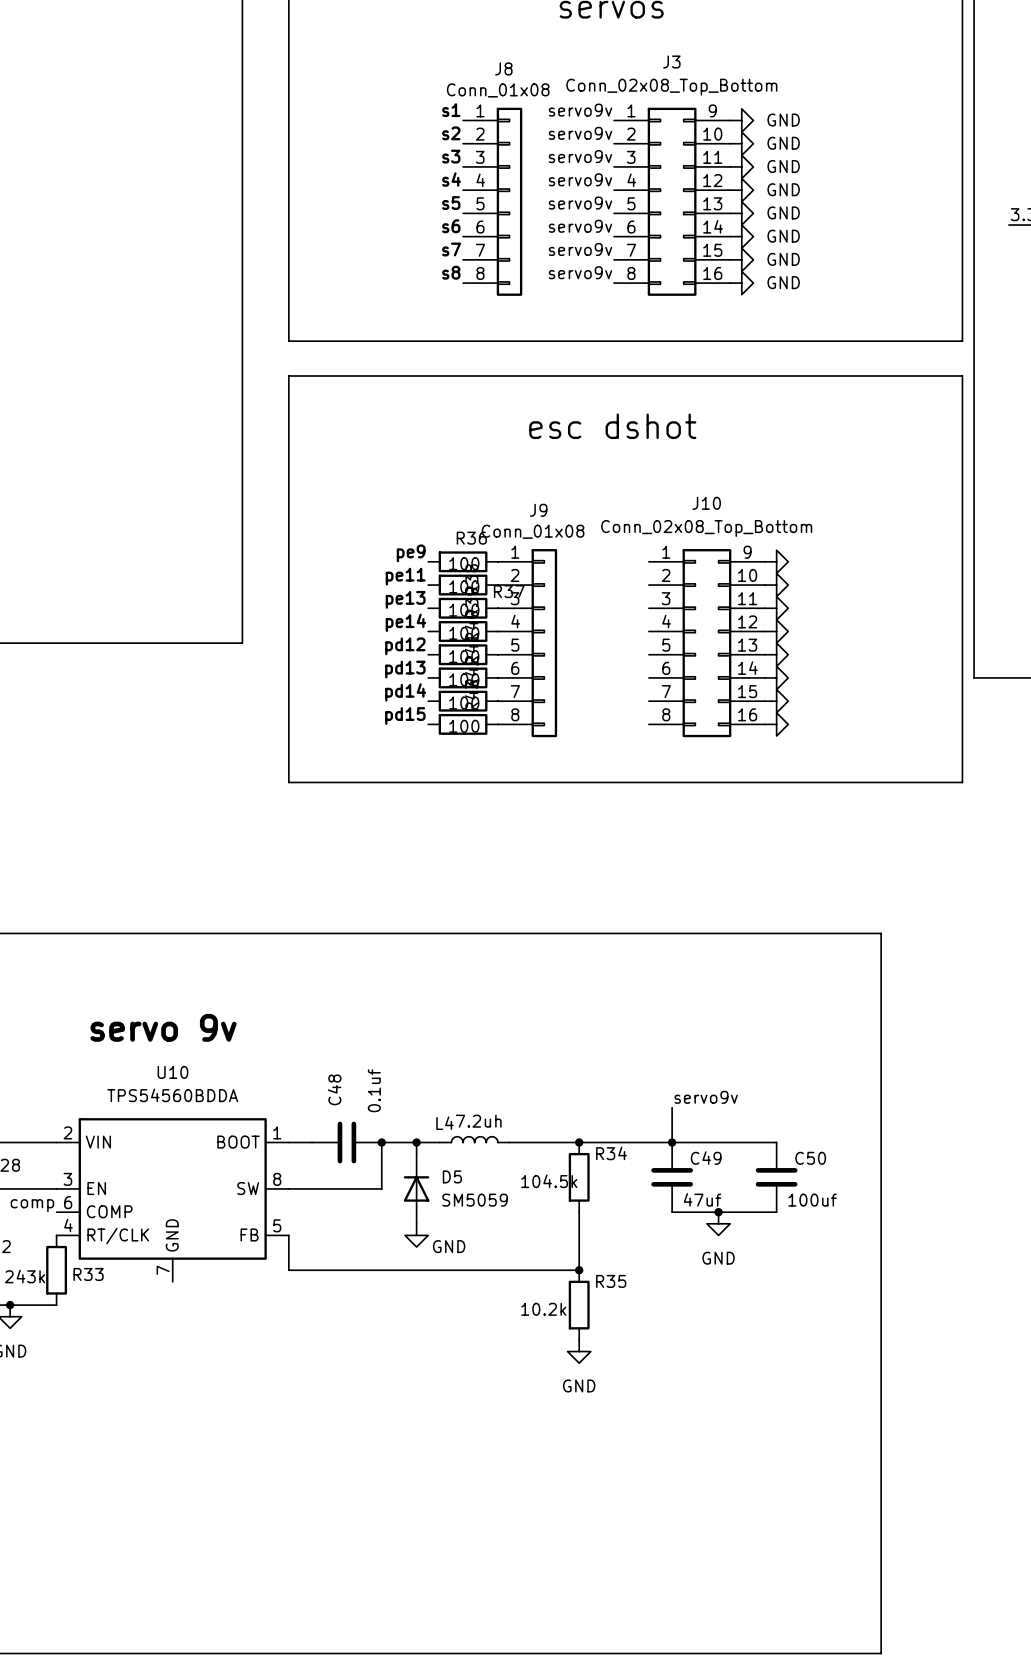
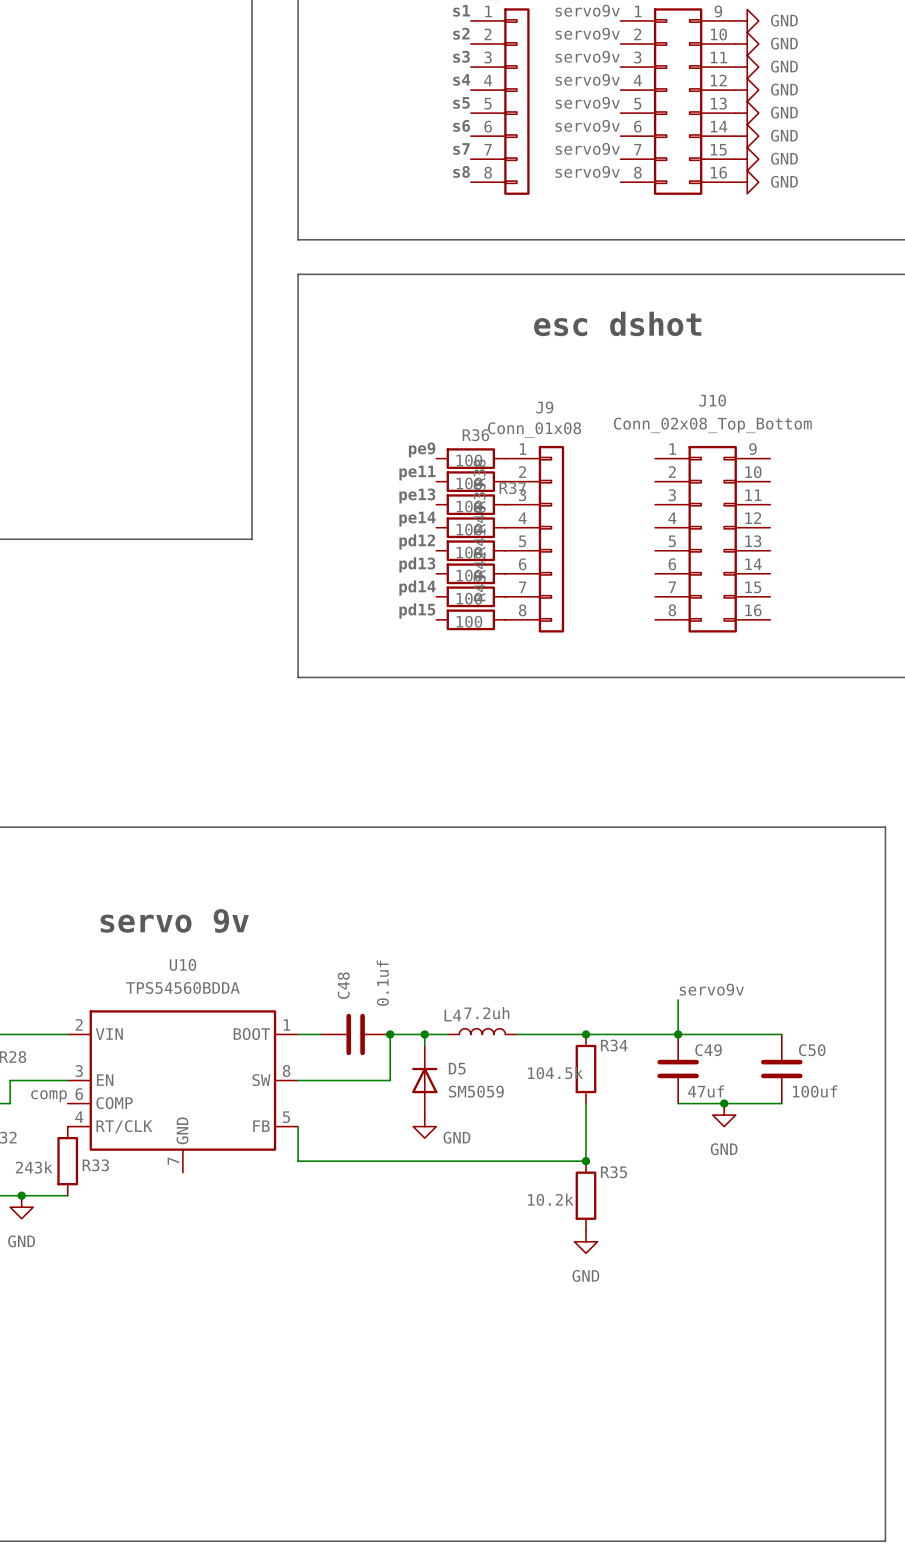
power symbol: (776, 561) -> none
power symbol: (776, 585) -> none
power symbol: (776, 608) -> none
power symbol: (776, 631) -> none
power symbol: (776, 654) -> none
power symbol: (776, 677) -> none
power symbol: (776, 701) -> none
power symbol: (776, 724) -> none

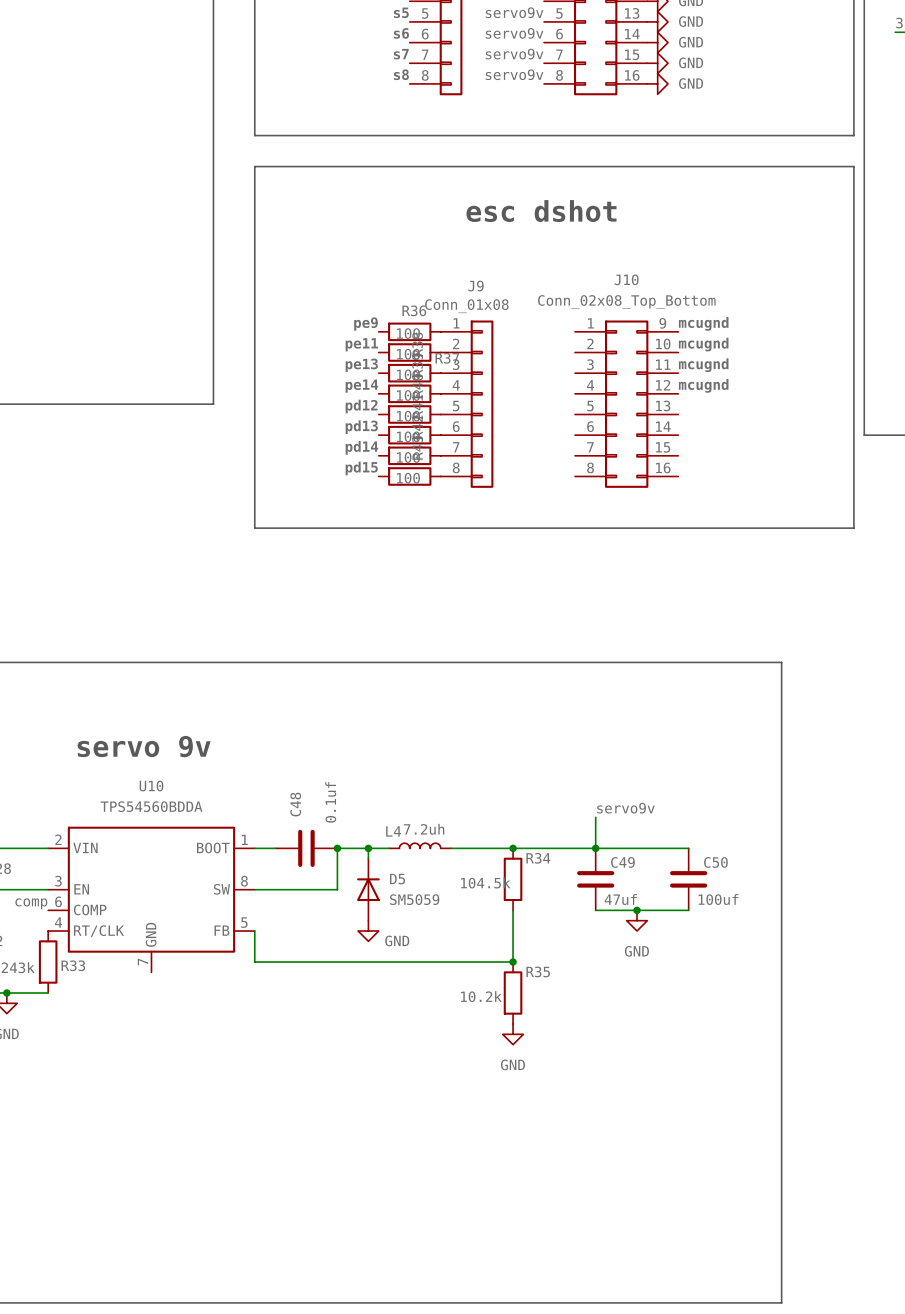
label: none -> mcugnd (703, 323)
label: none -> mcugnd (703, 344)
label: none -> mcugnd (703, 365)
label: none -> mcugnd (703, 385)

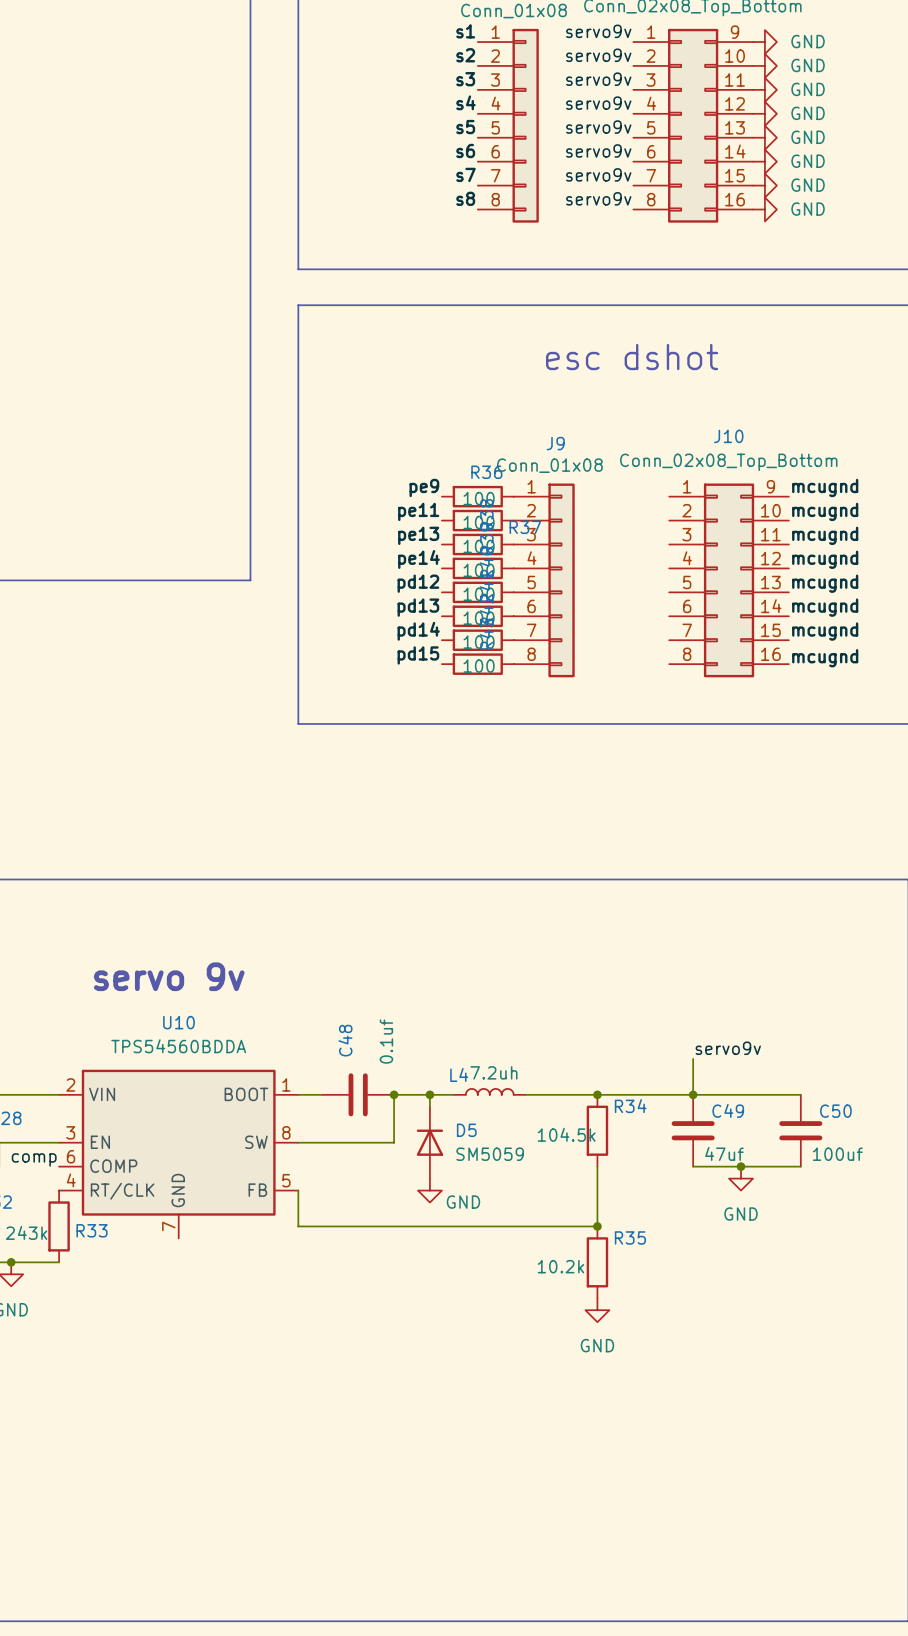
label: none -> mcugnd (825, 583)
label: none -> mcugnd (825, 607)
label: none -> mcugnd (825, 631)
label: none -> mcugnd (825, 658)

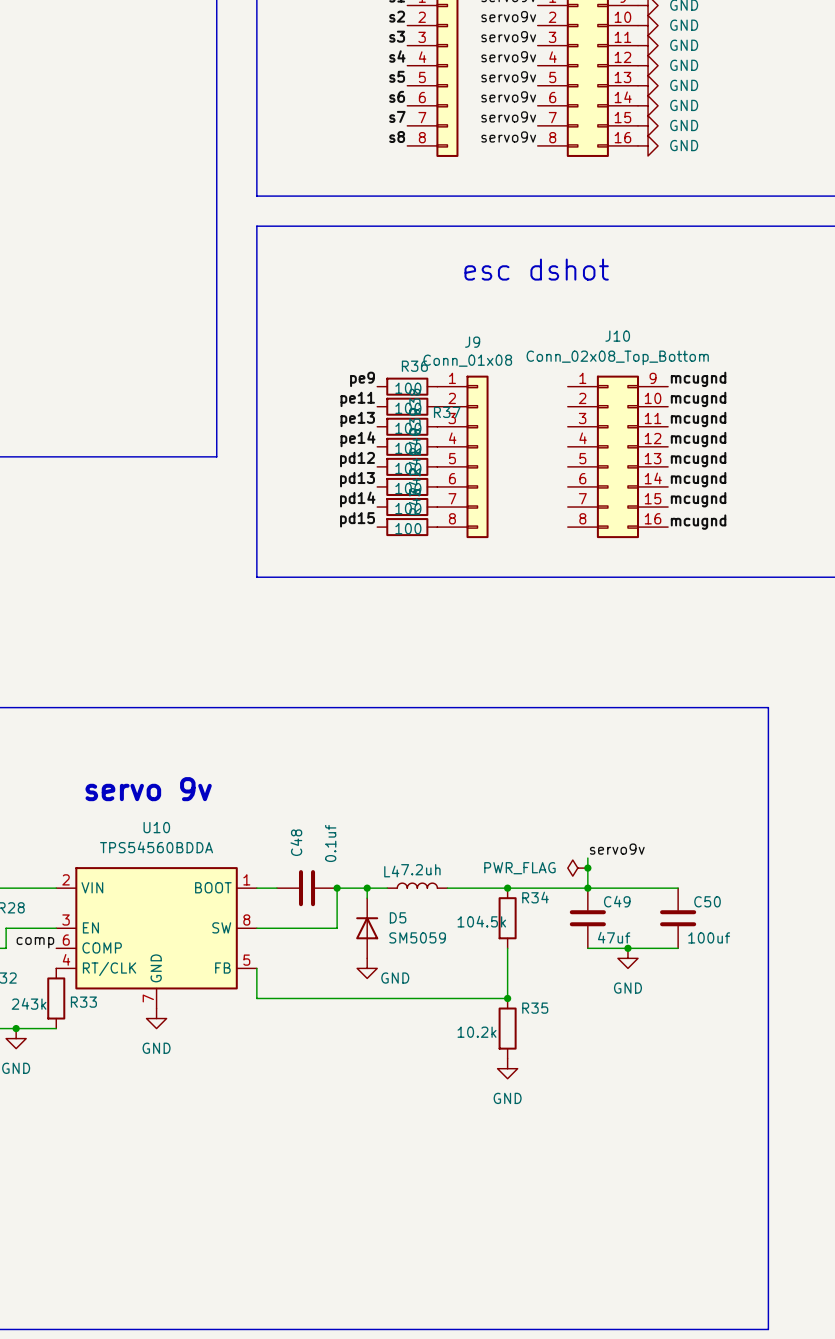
power symbol: none -> PWR_FLAG (577, 868)
junction: none -> (587, 868)
power symbol: none -> GND (156, 1018)

